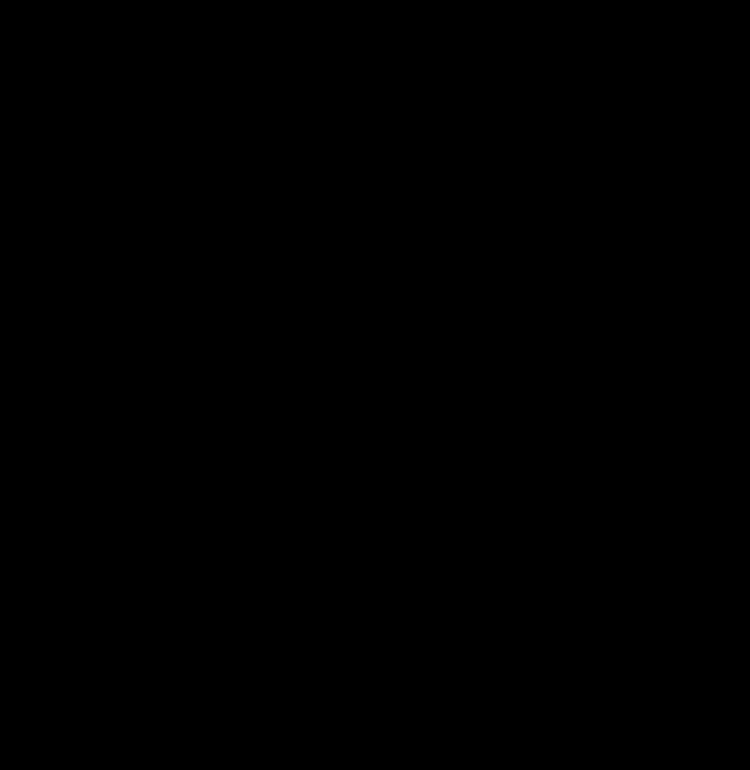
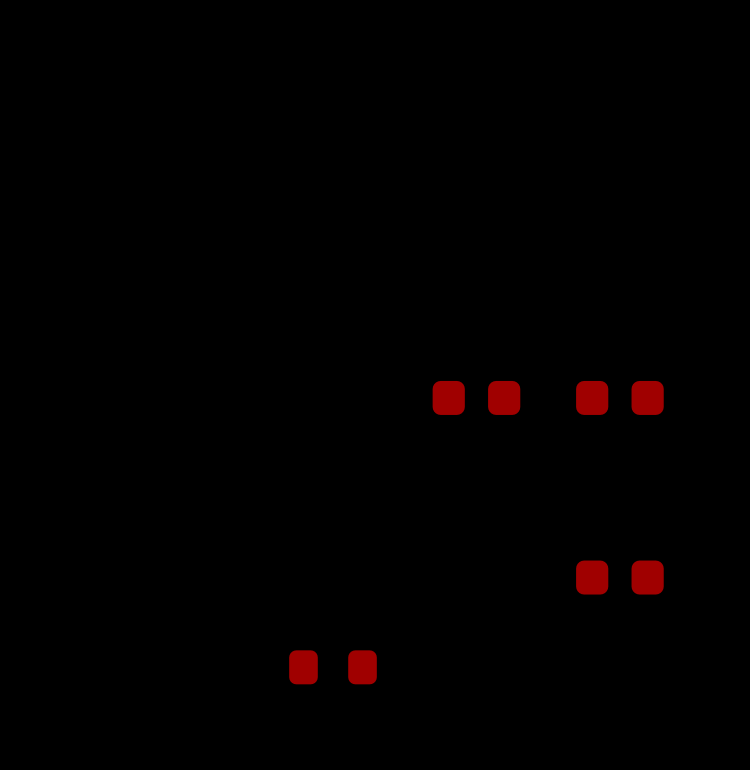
part: none -> (476, 397)
part: none -> (619, 397)
part: none -> (619, 577)
part: none -> (333, 667)

